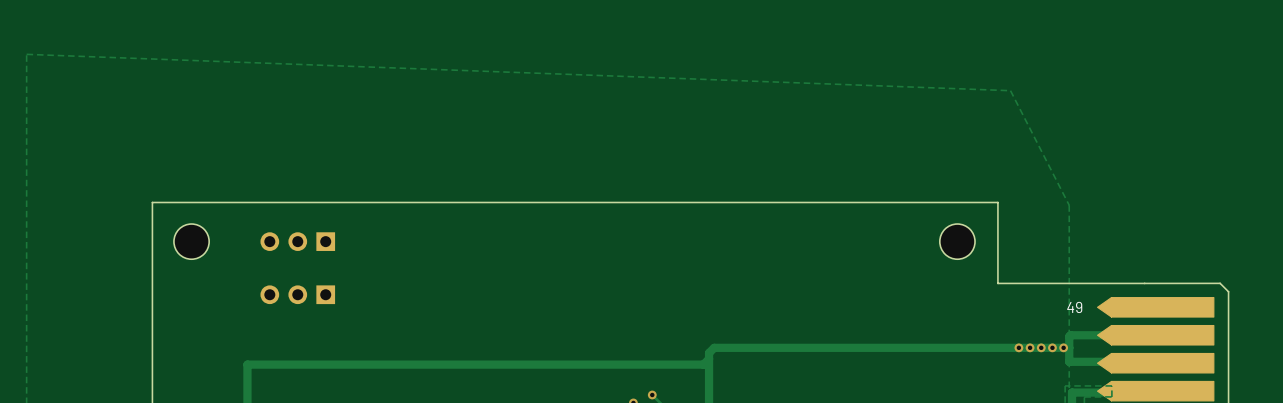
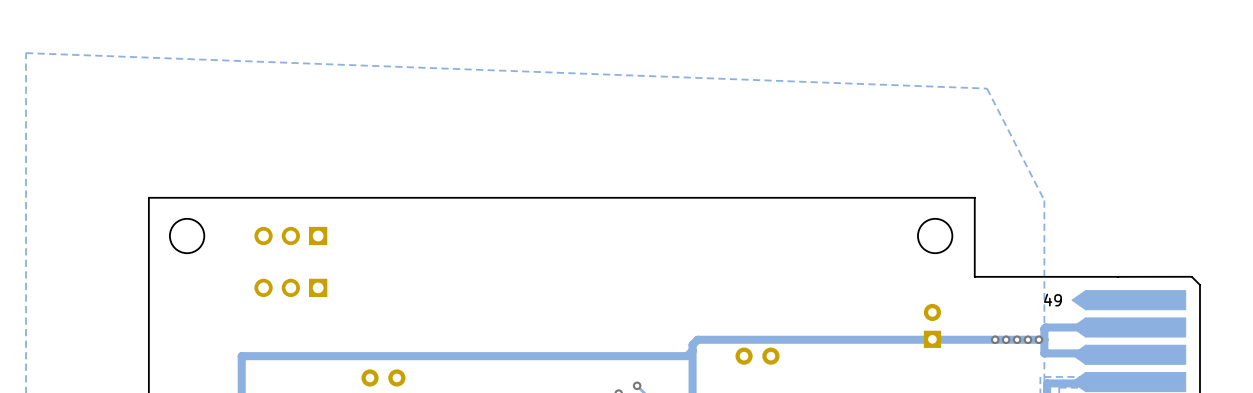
part: none -> (932, 325)
part: none -> (757, 356)
part: none -> (383, 377)

